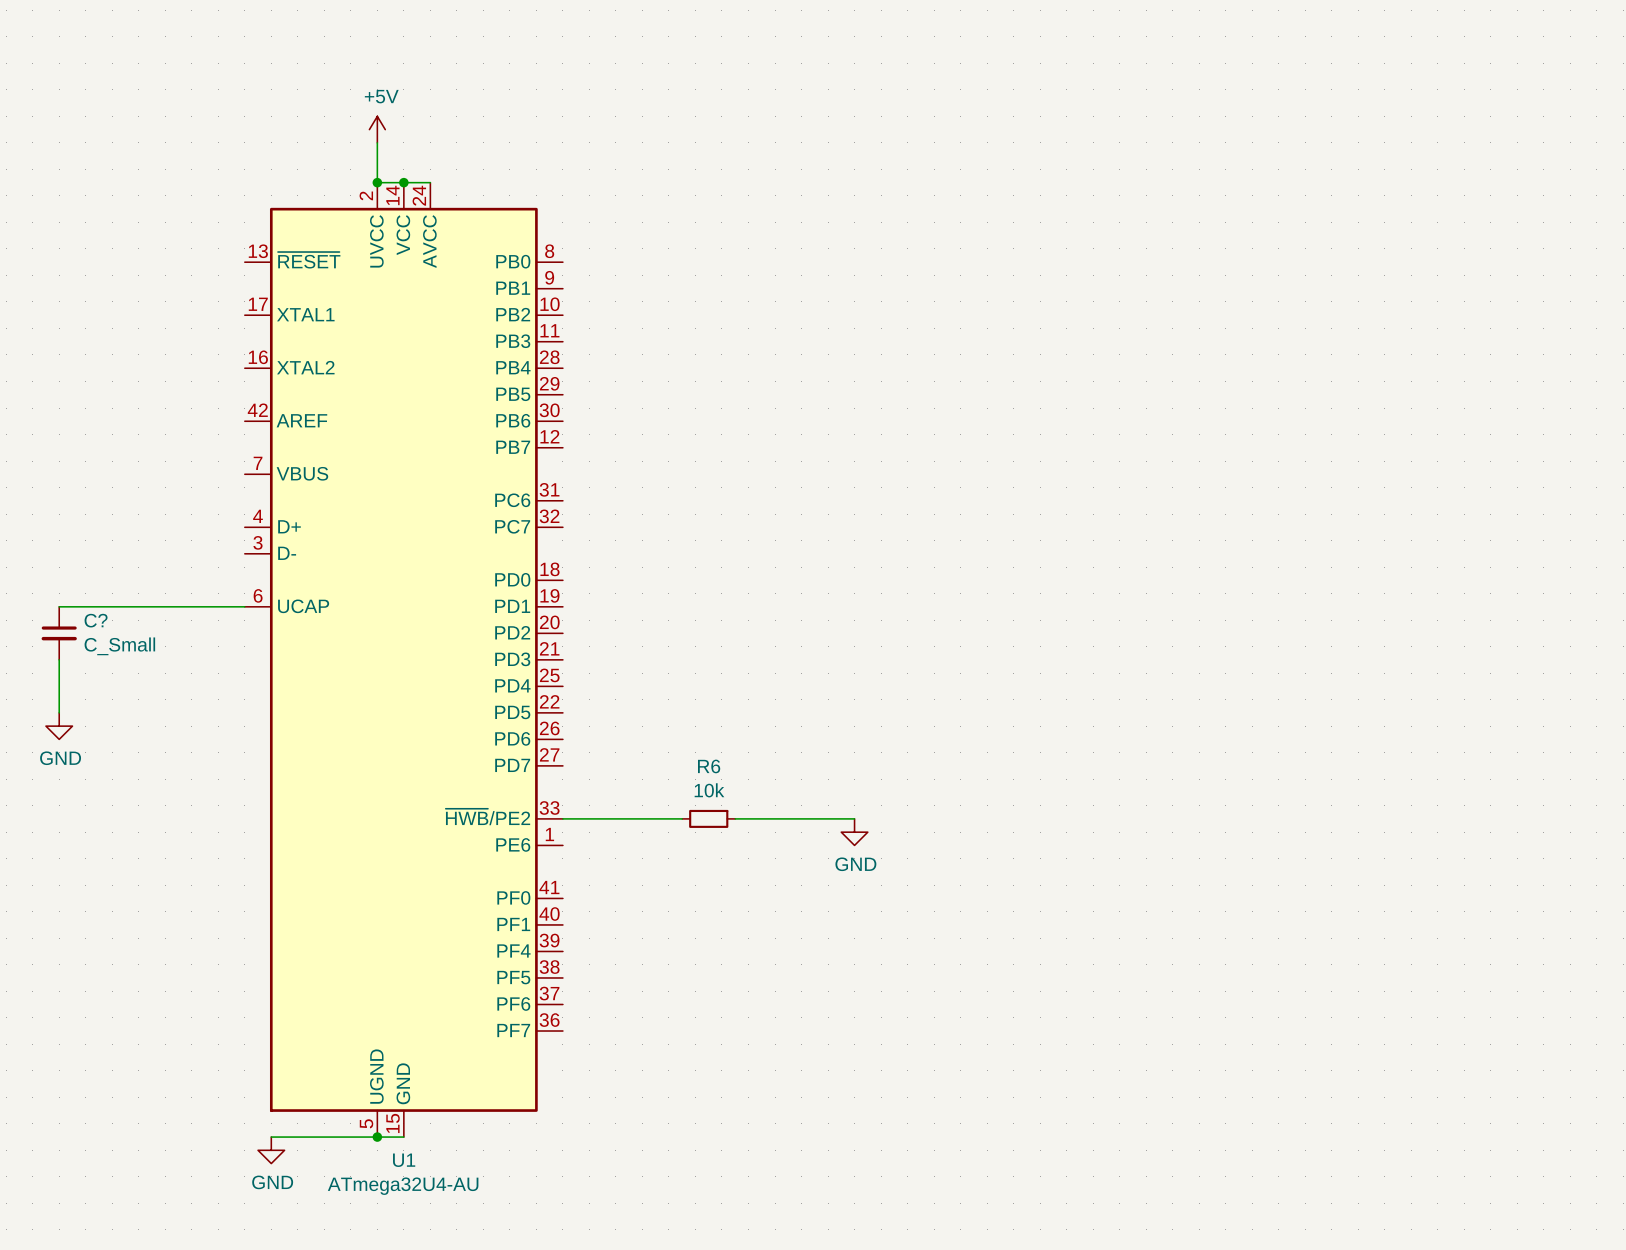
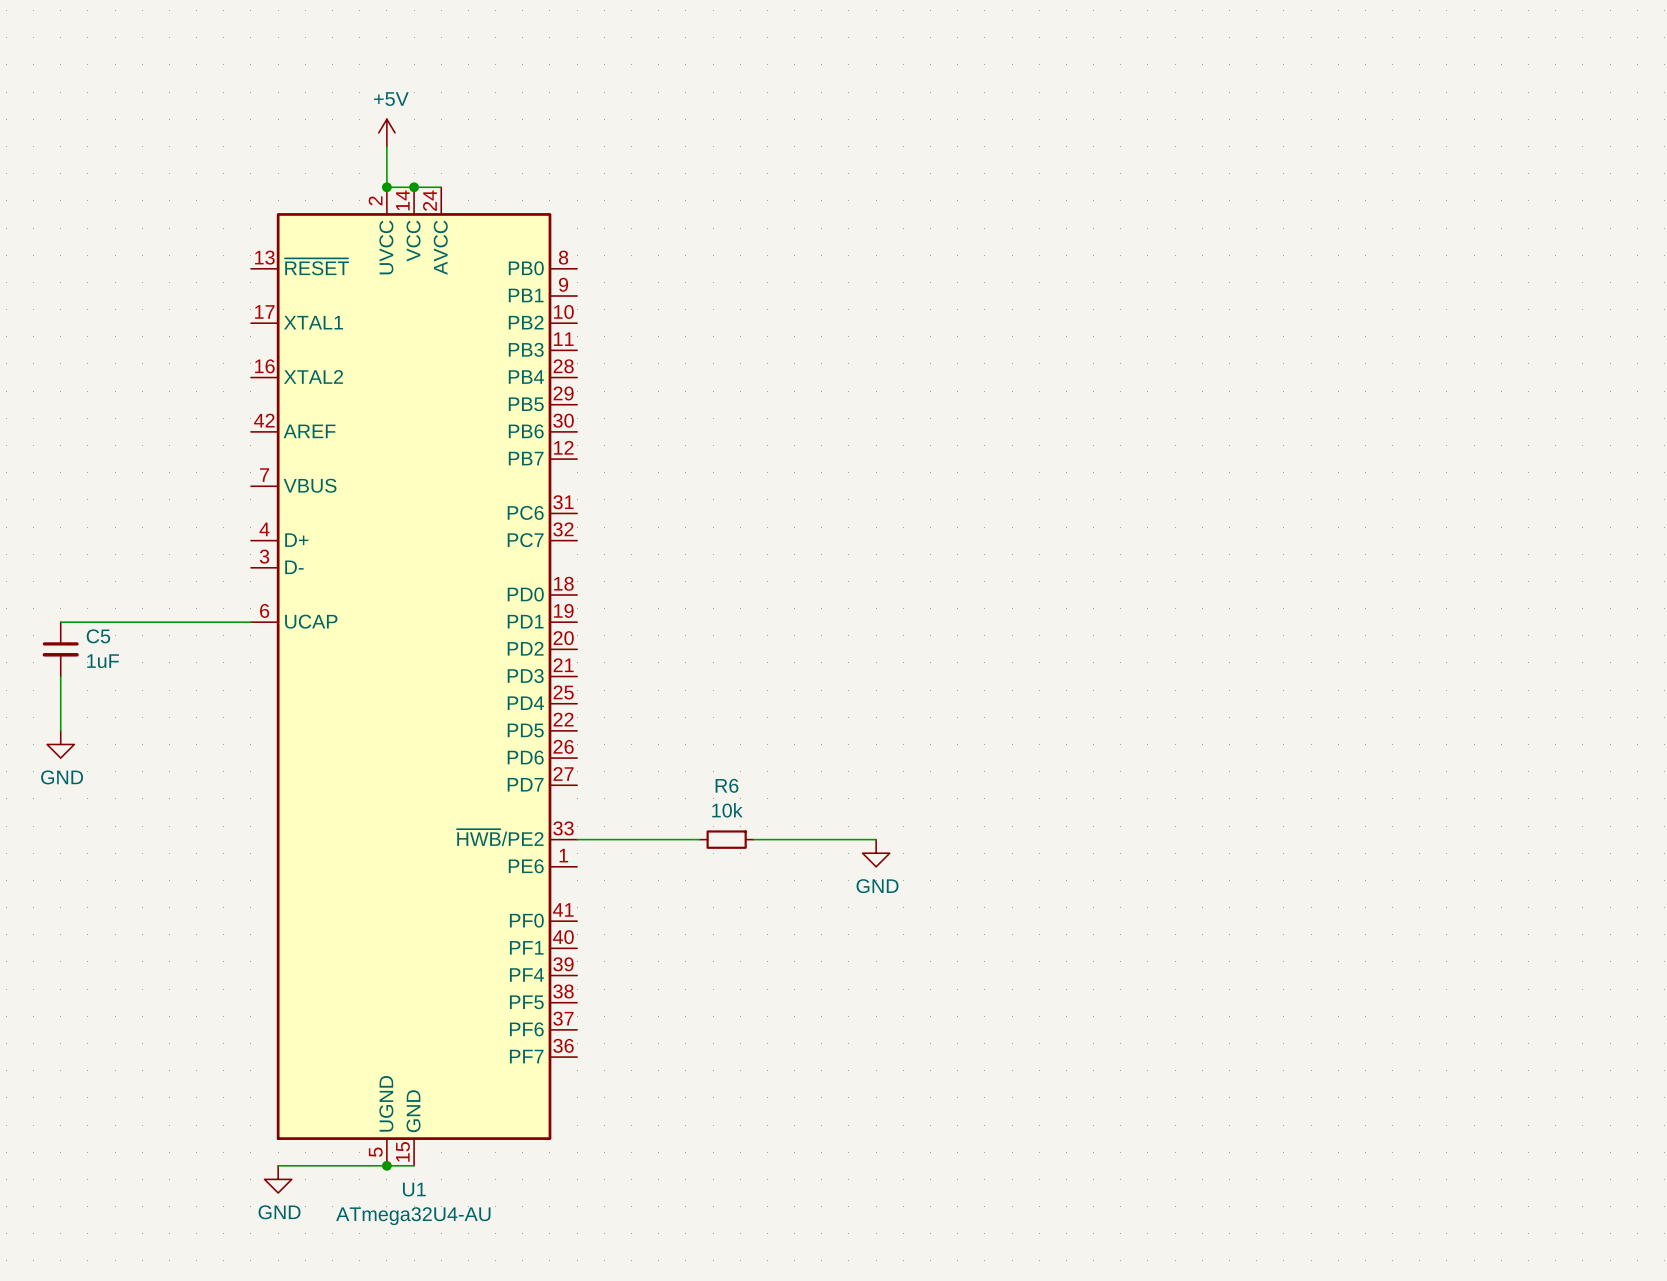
C? name: C? (96, 620) -> C5 (98, 636)
C? value: C_Small (119, 646) -> 1uF (103, 661)

